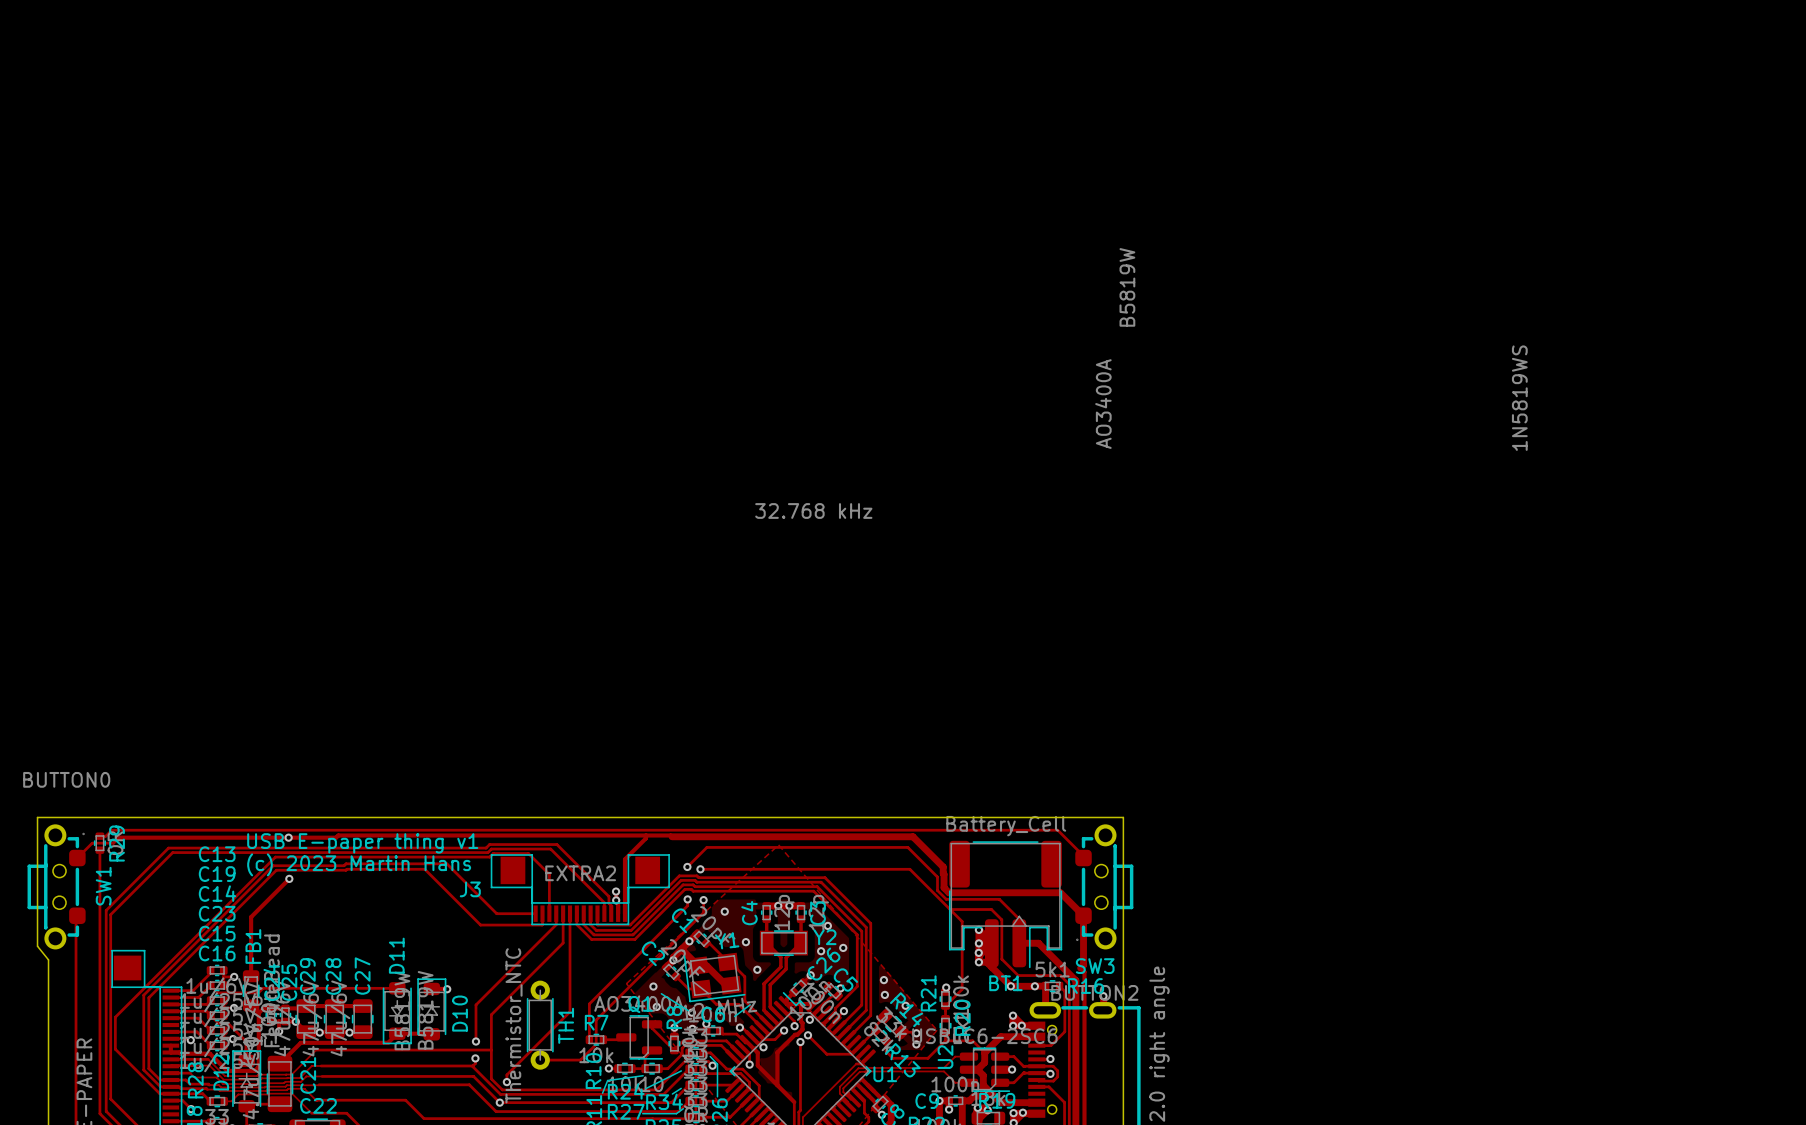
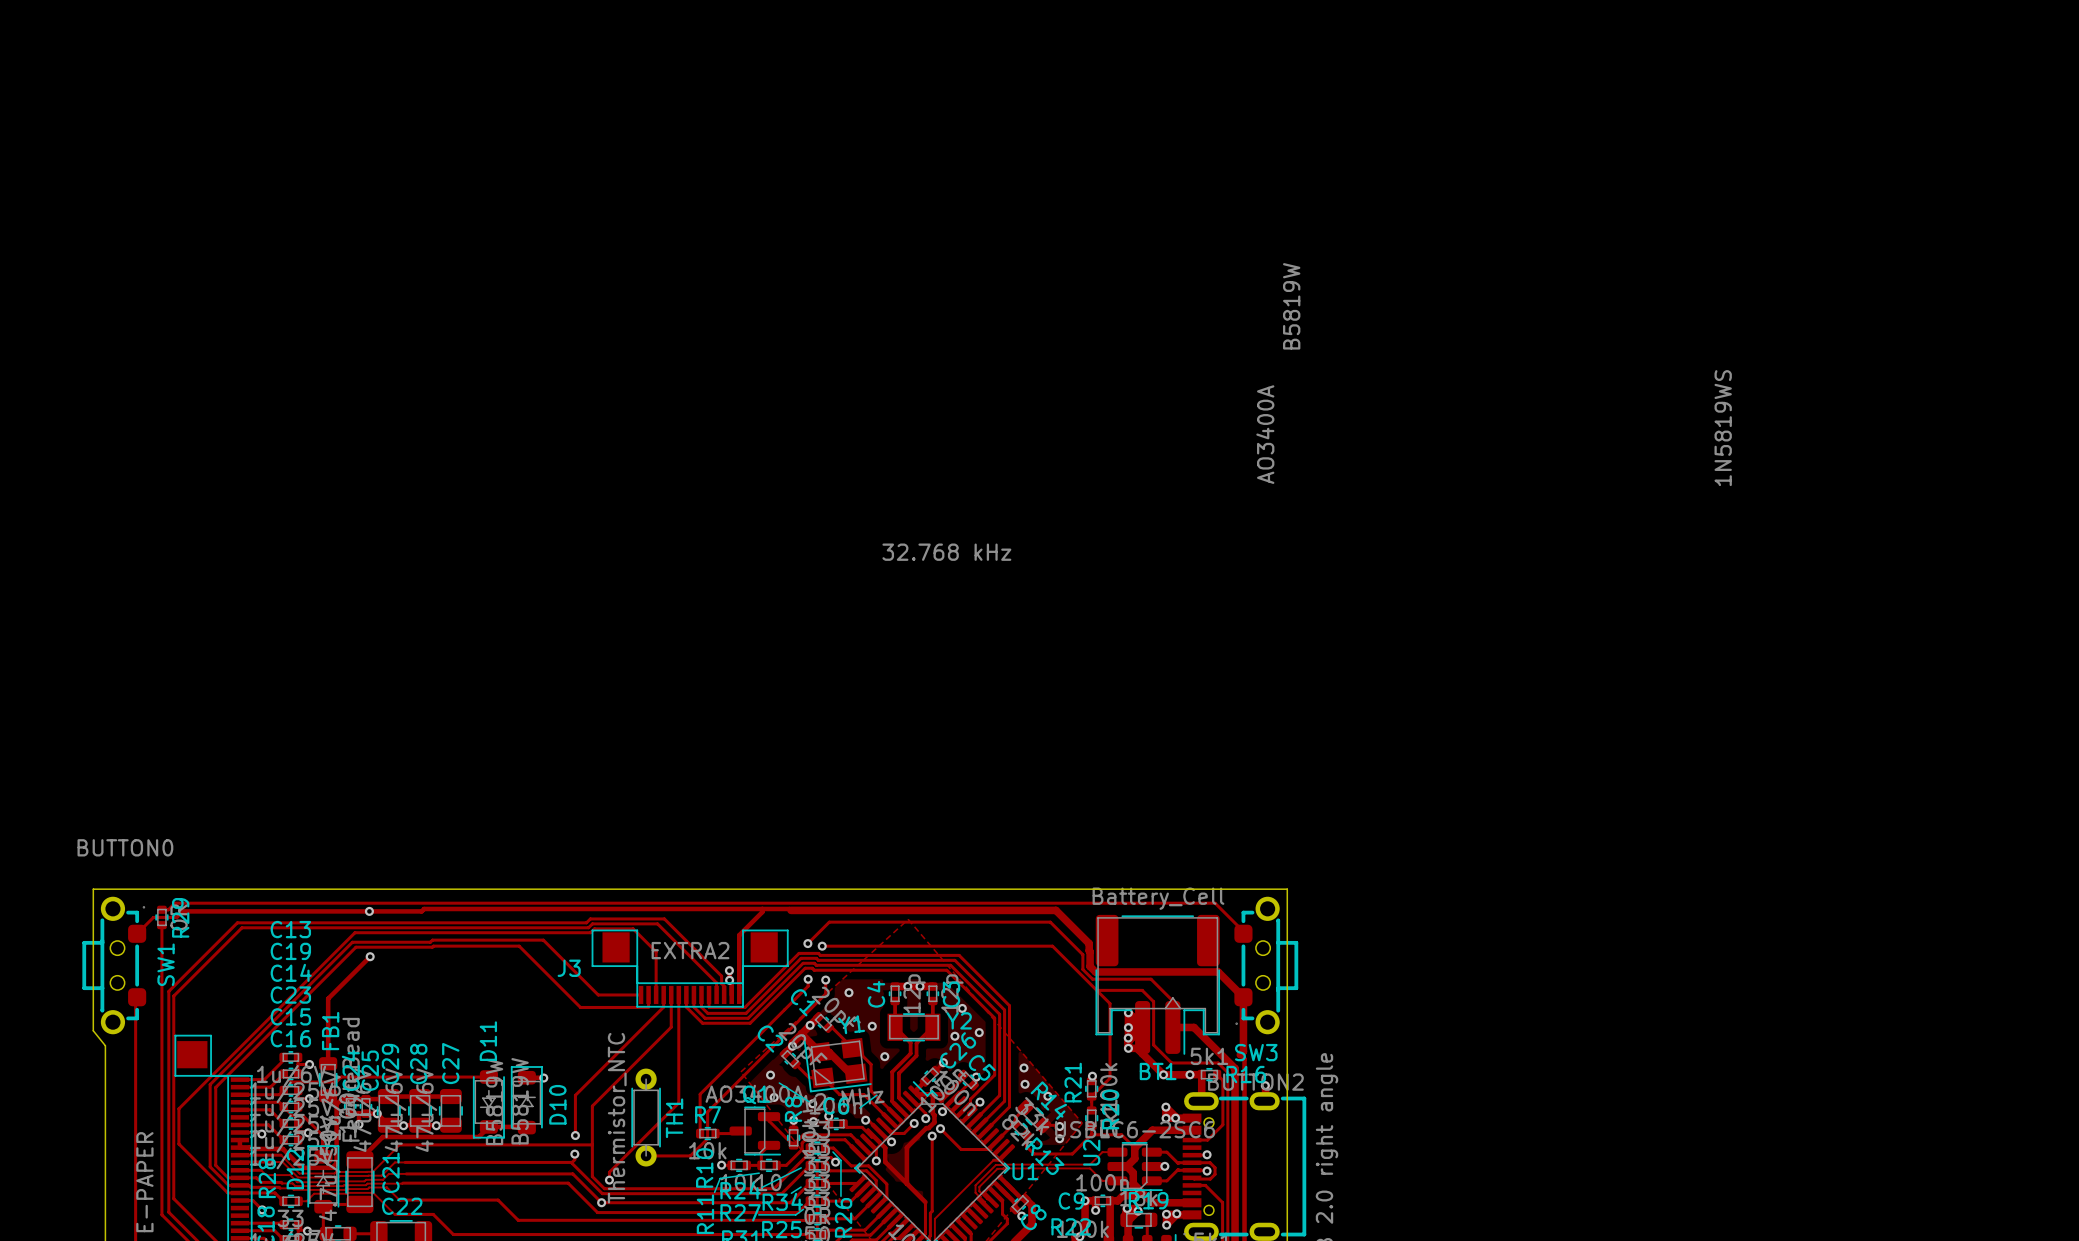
text: USB E-paper thing v1 (362, 843) -> none
text: (c) 2023 Martin Hans (359, 864) -> none

